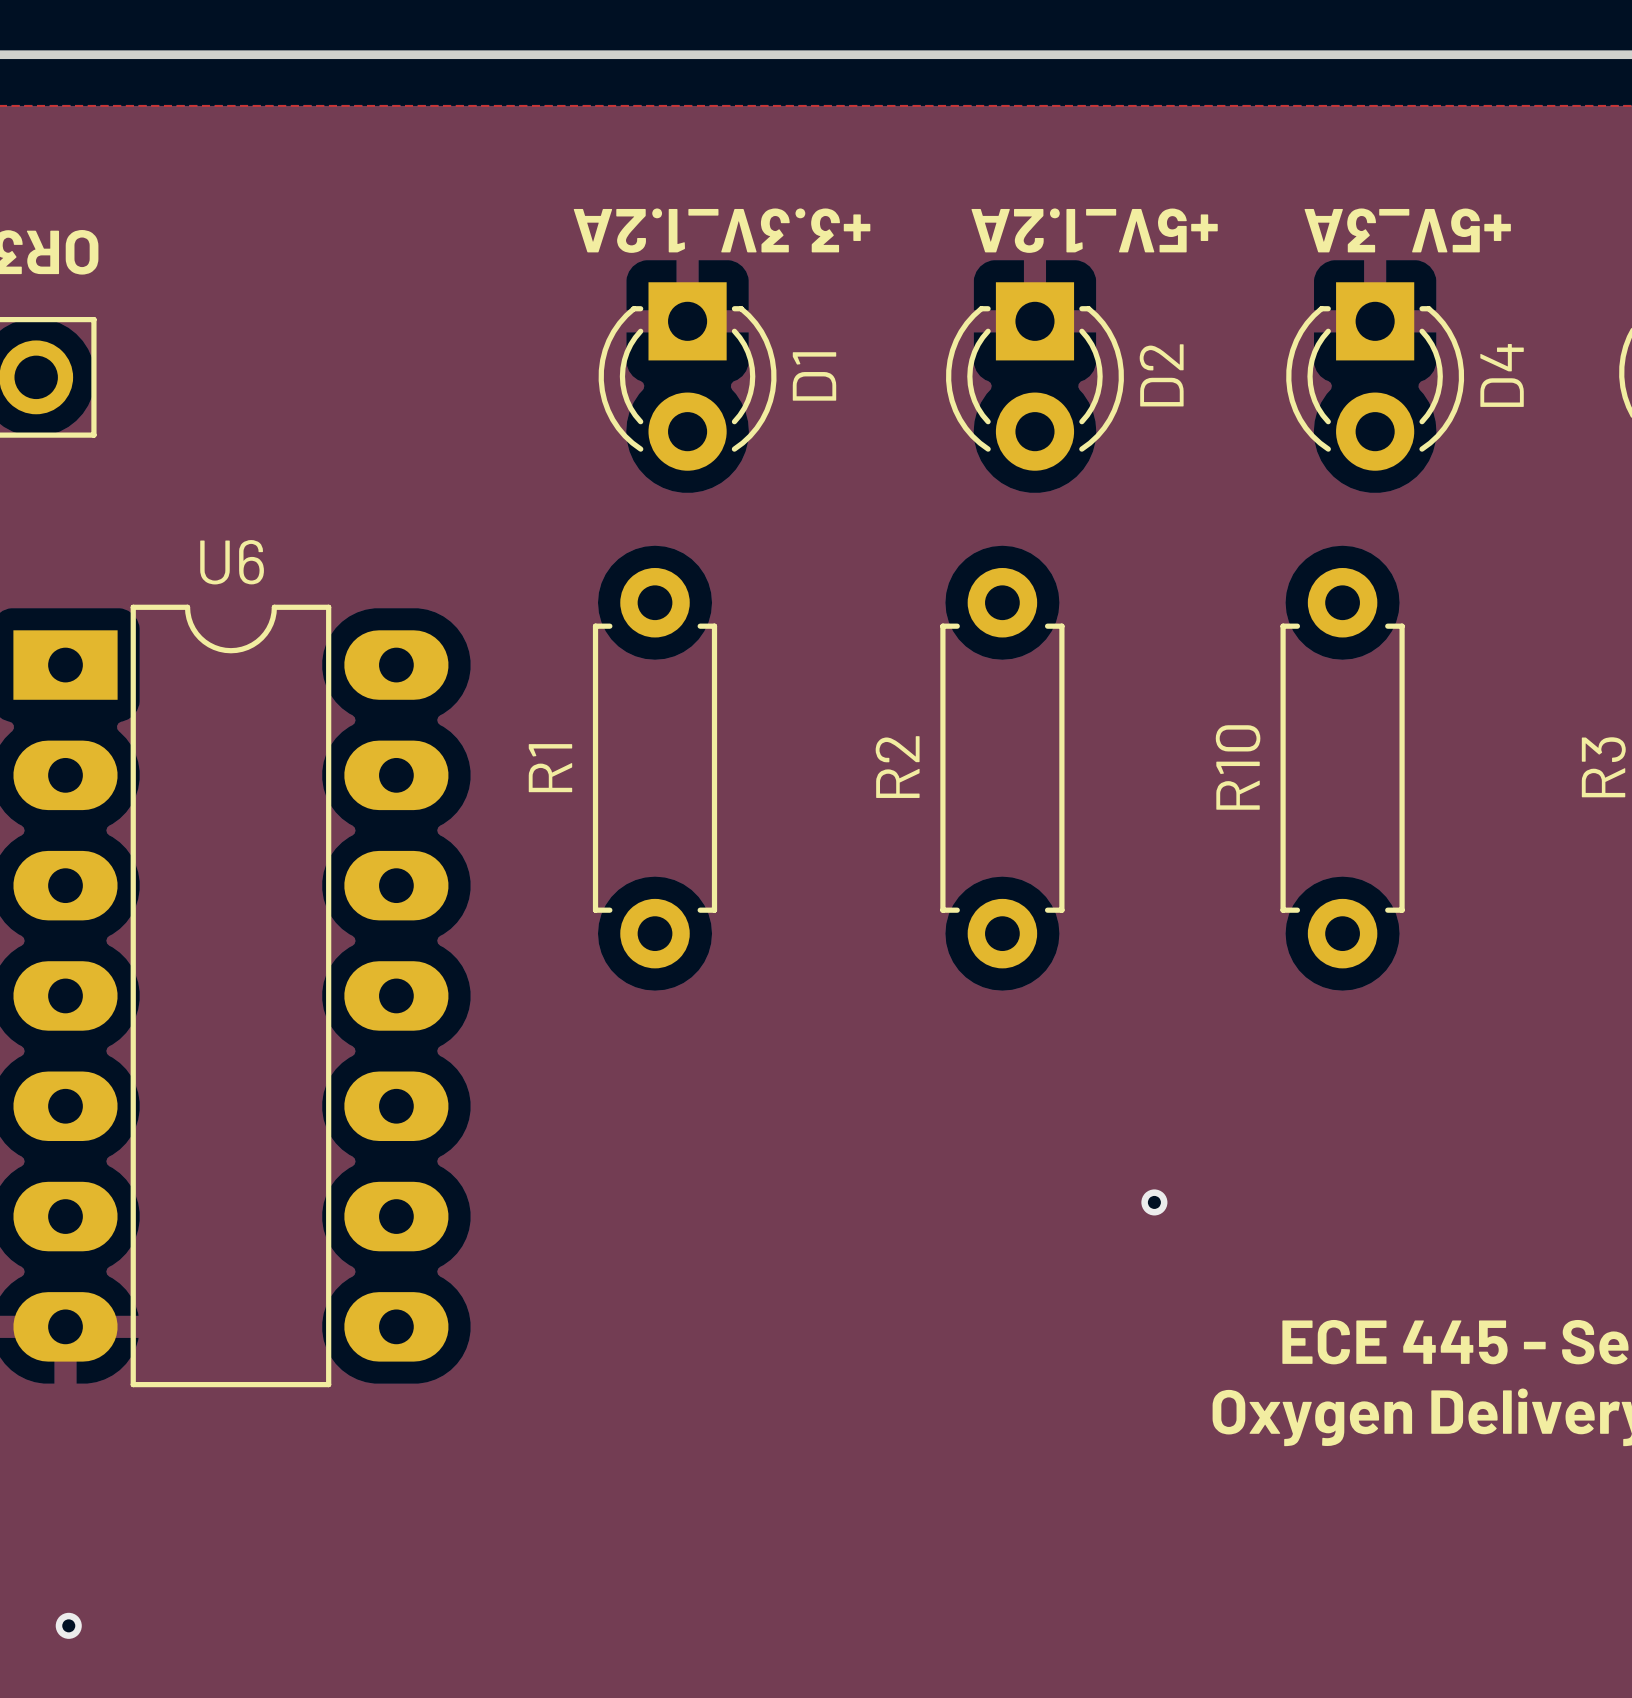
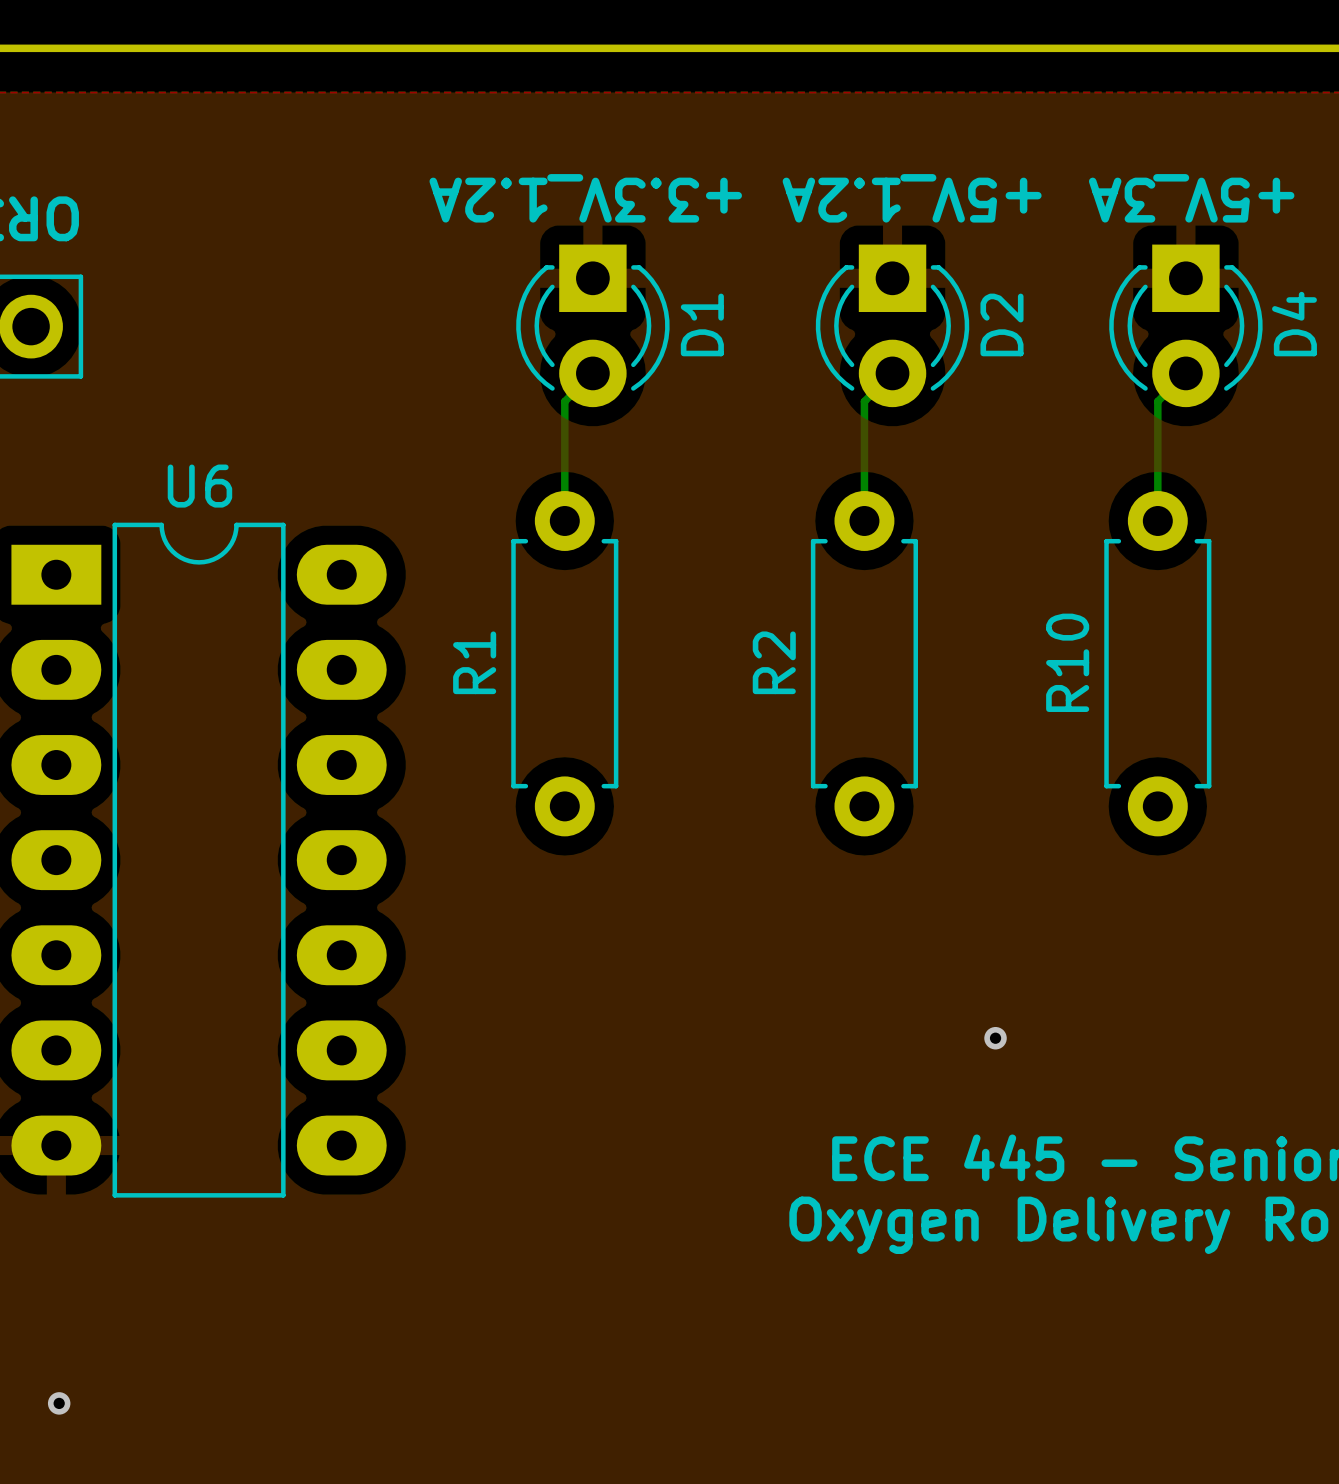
bottom track: none -> (592, 373) (564, 401) (564, 520)
bottom track: none -> (892, 373) (864, 401) (864, 520)
bottom track: none -> (1185, 373) (1157, 401) (1157, 520)

